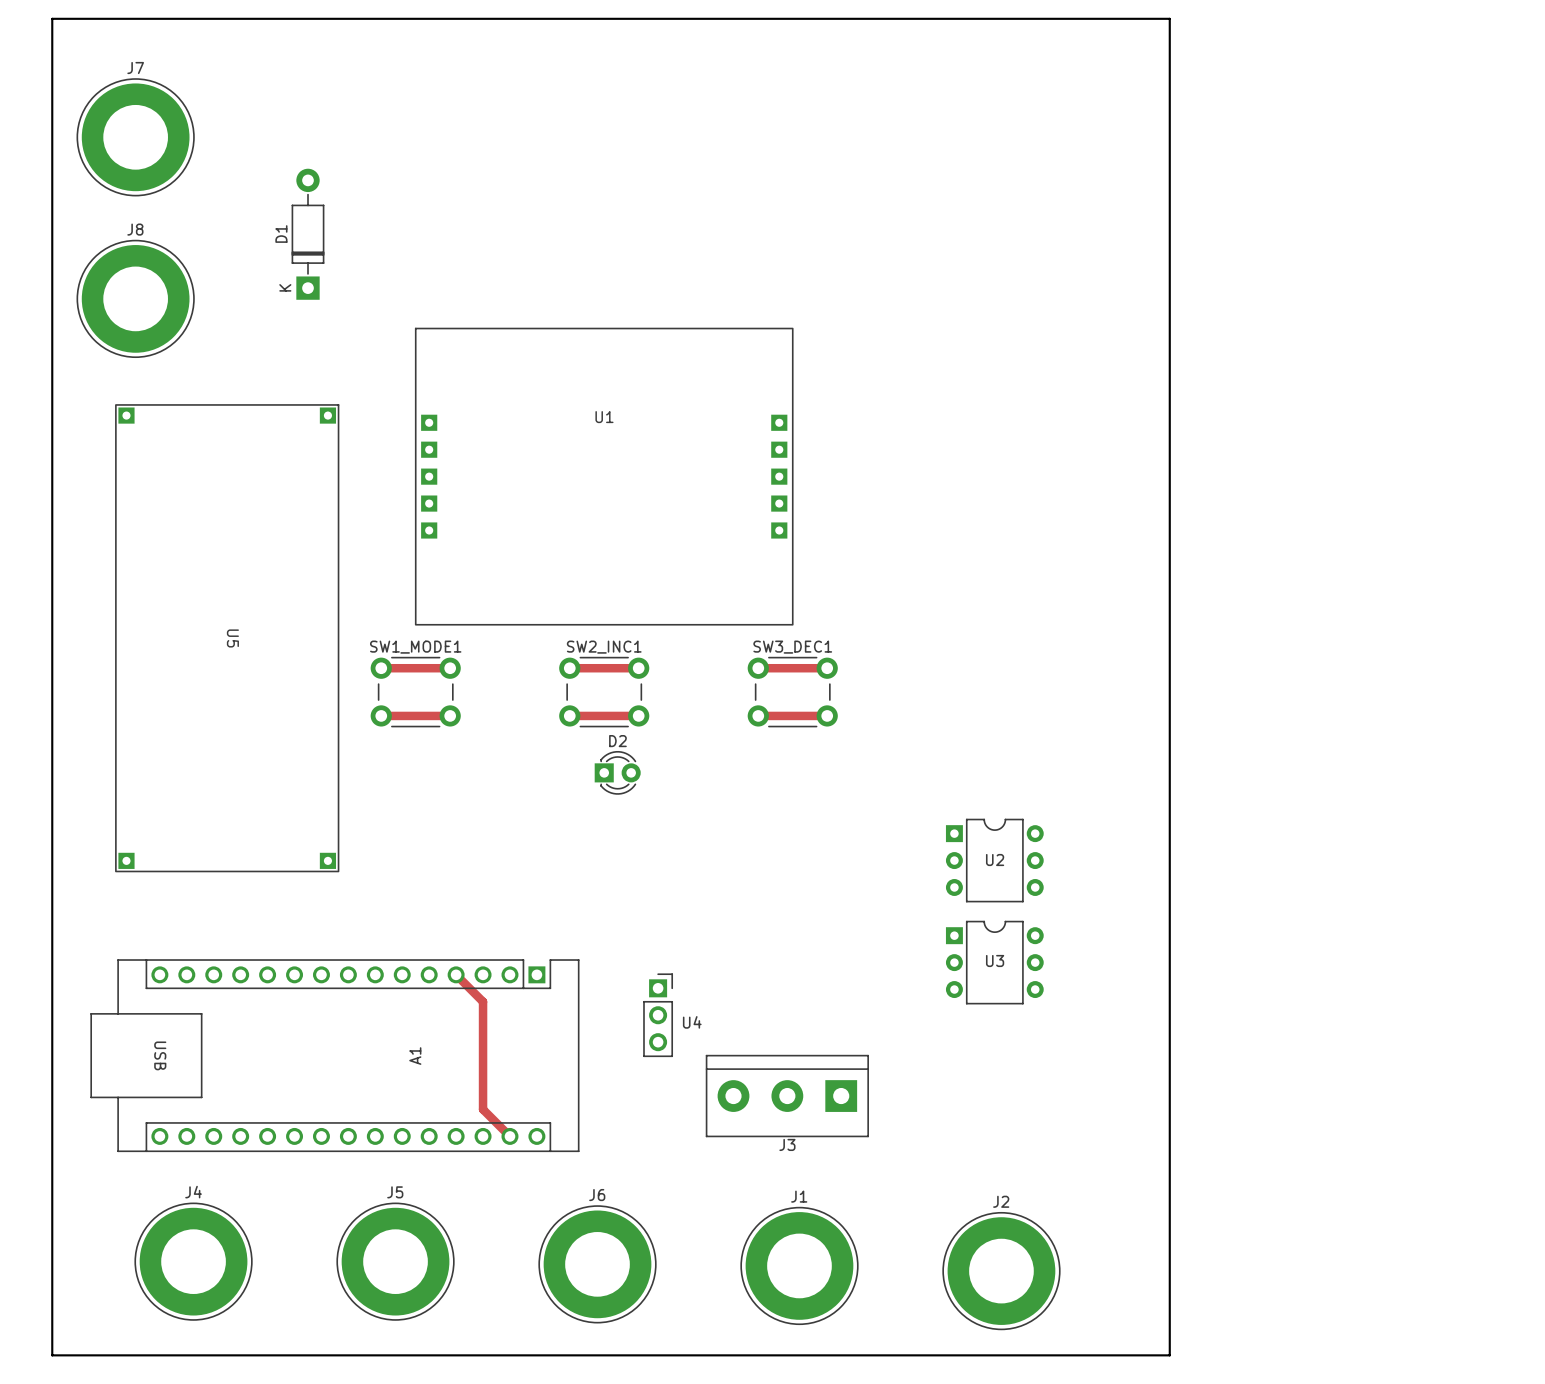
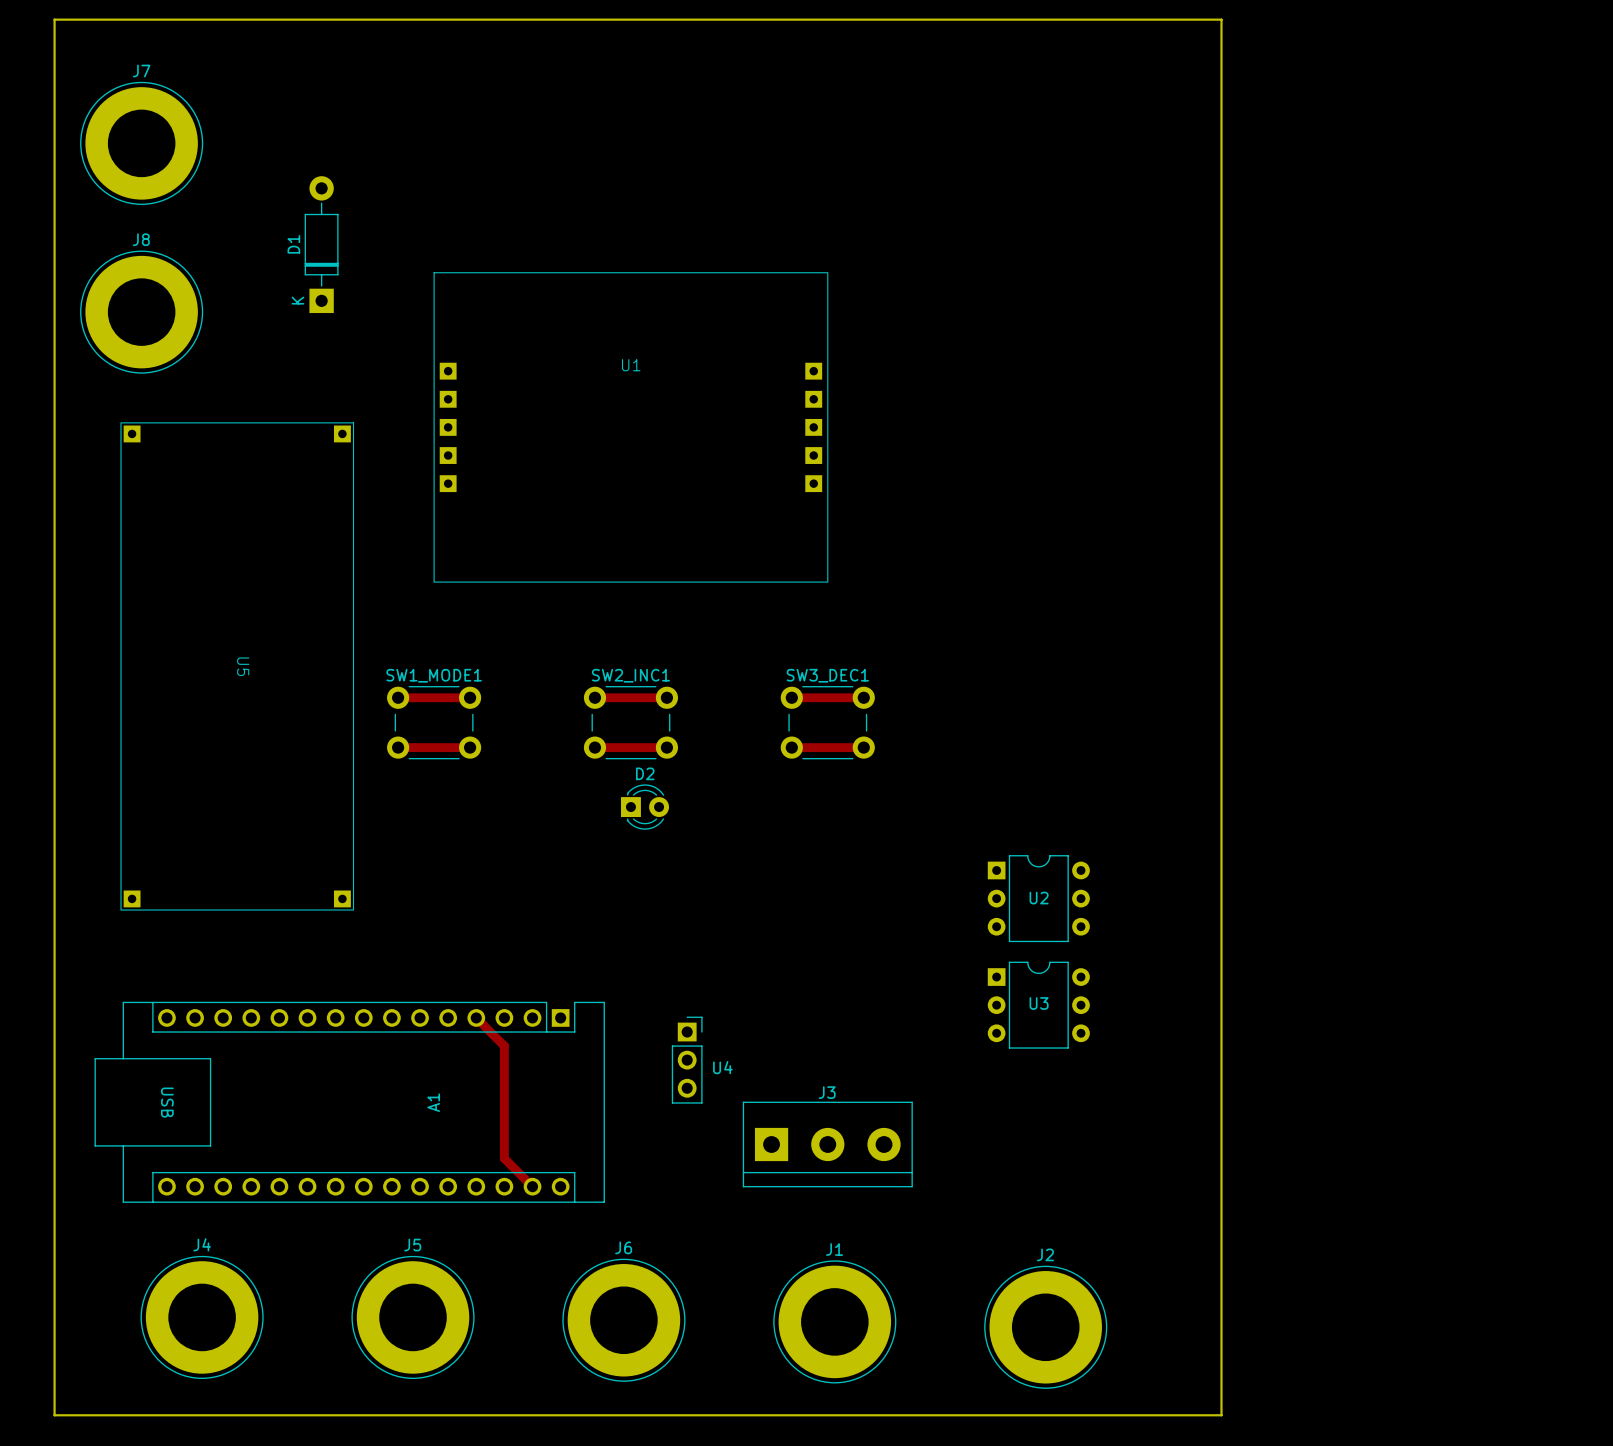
U1 position: (604, 476) -> (630, 427)
J3 rotation: 0° (787, 1096) -> 180° (827, 1144)

